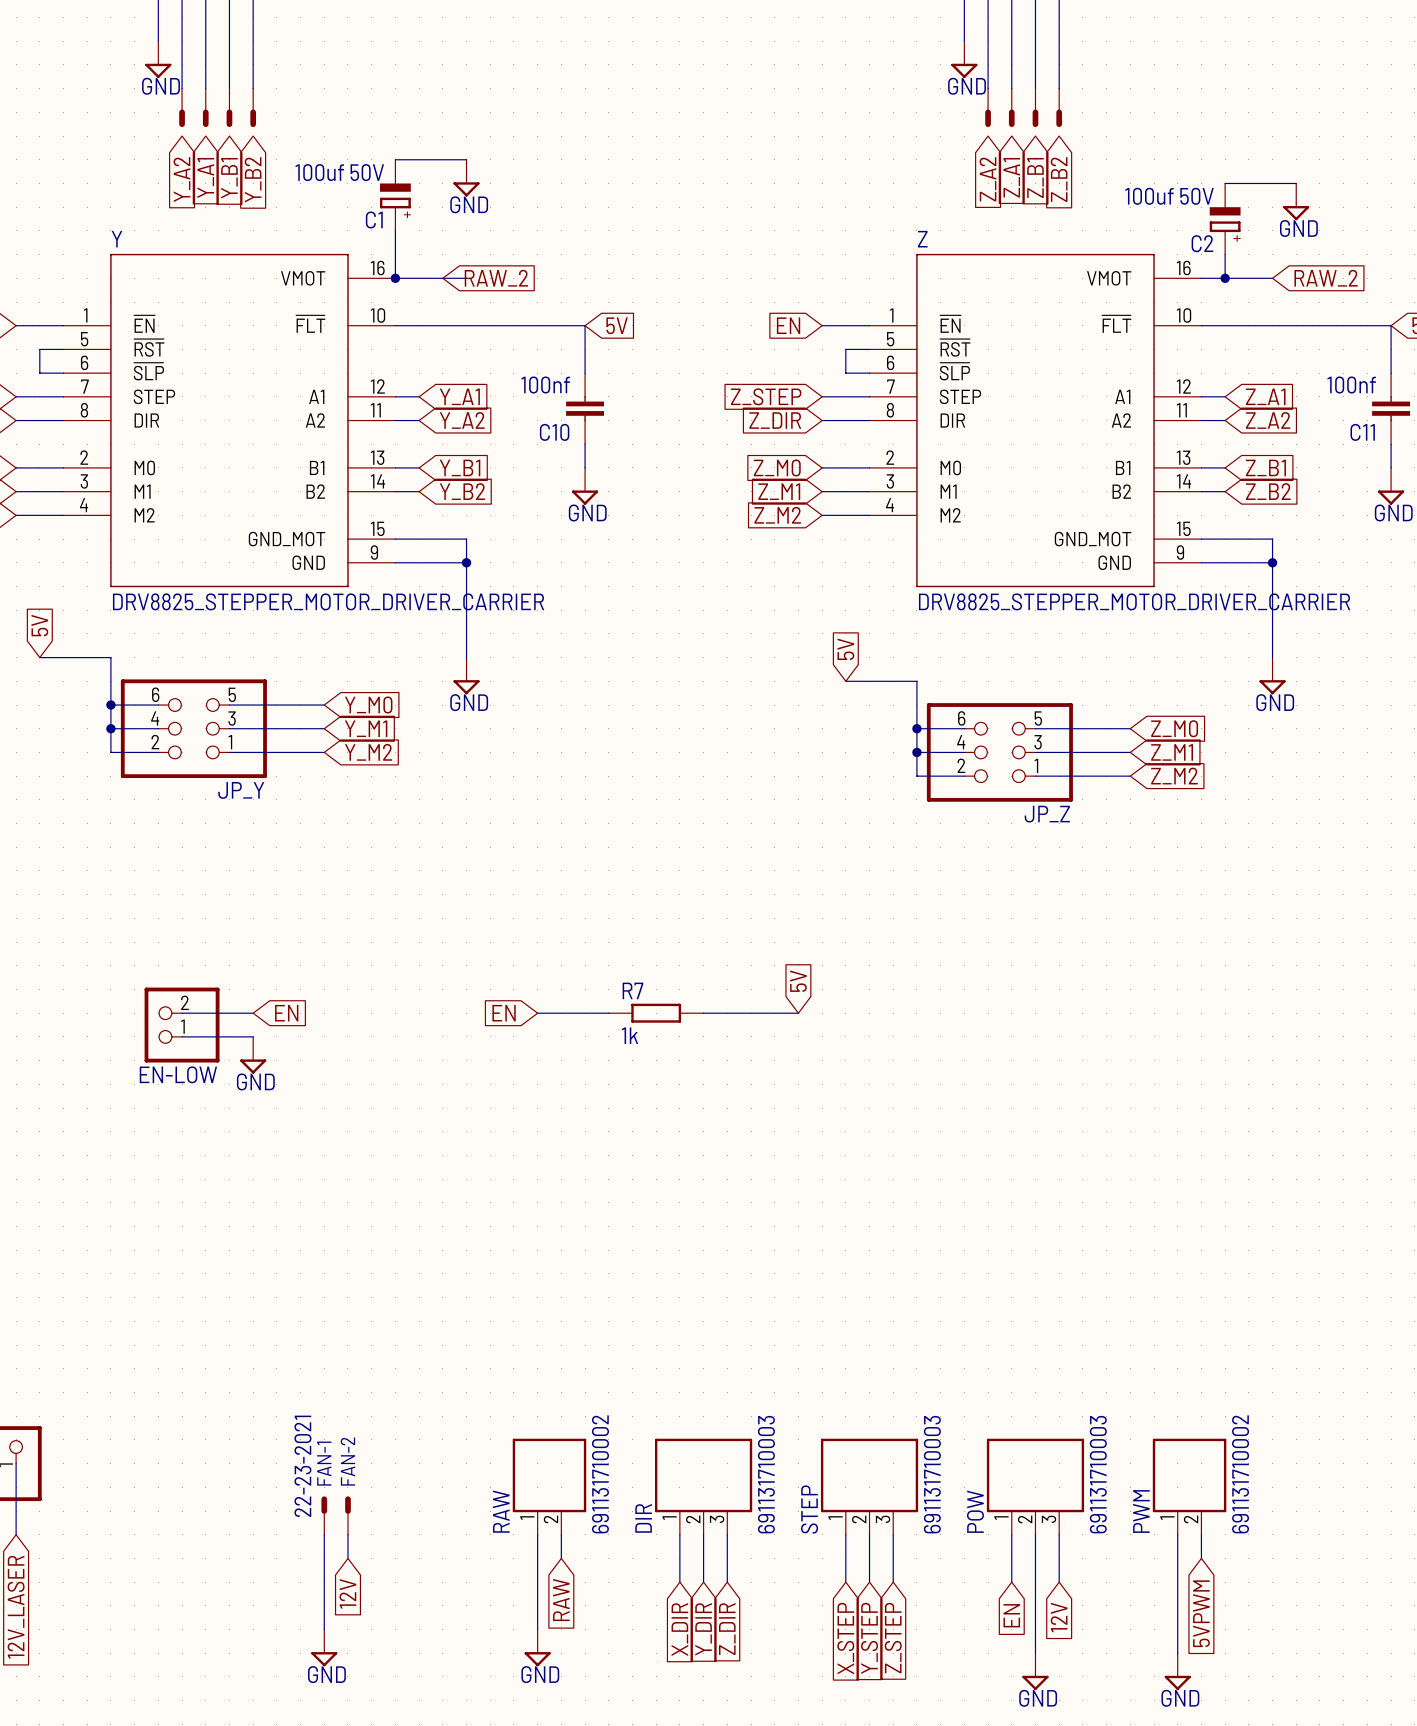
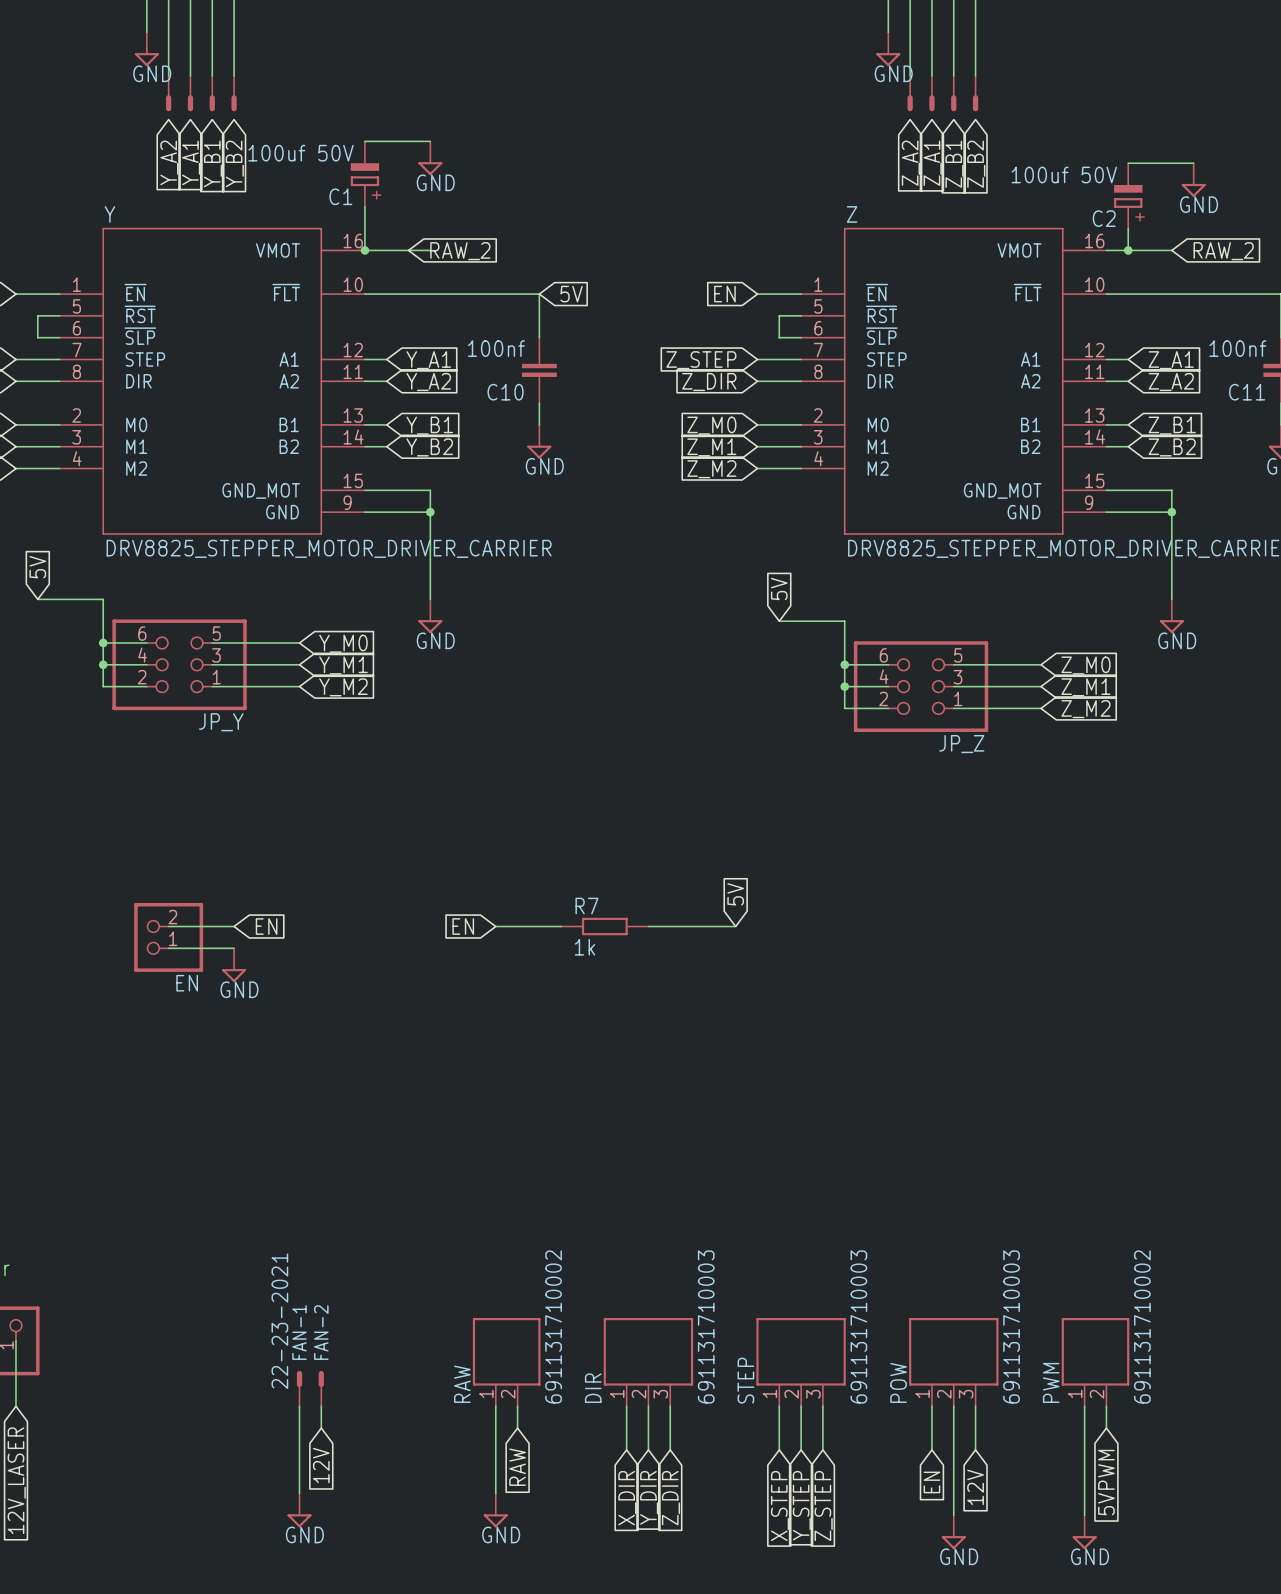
EN-LOW name: EN-LOW (178, 1074) -> EN (187, 983)

